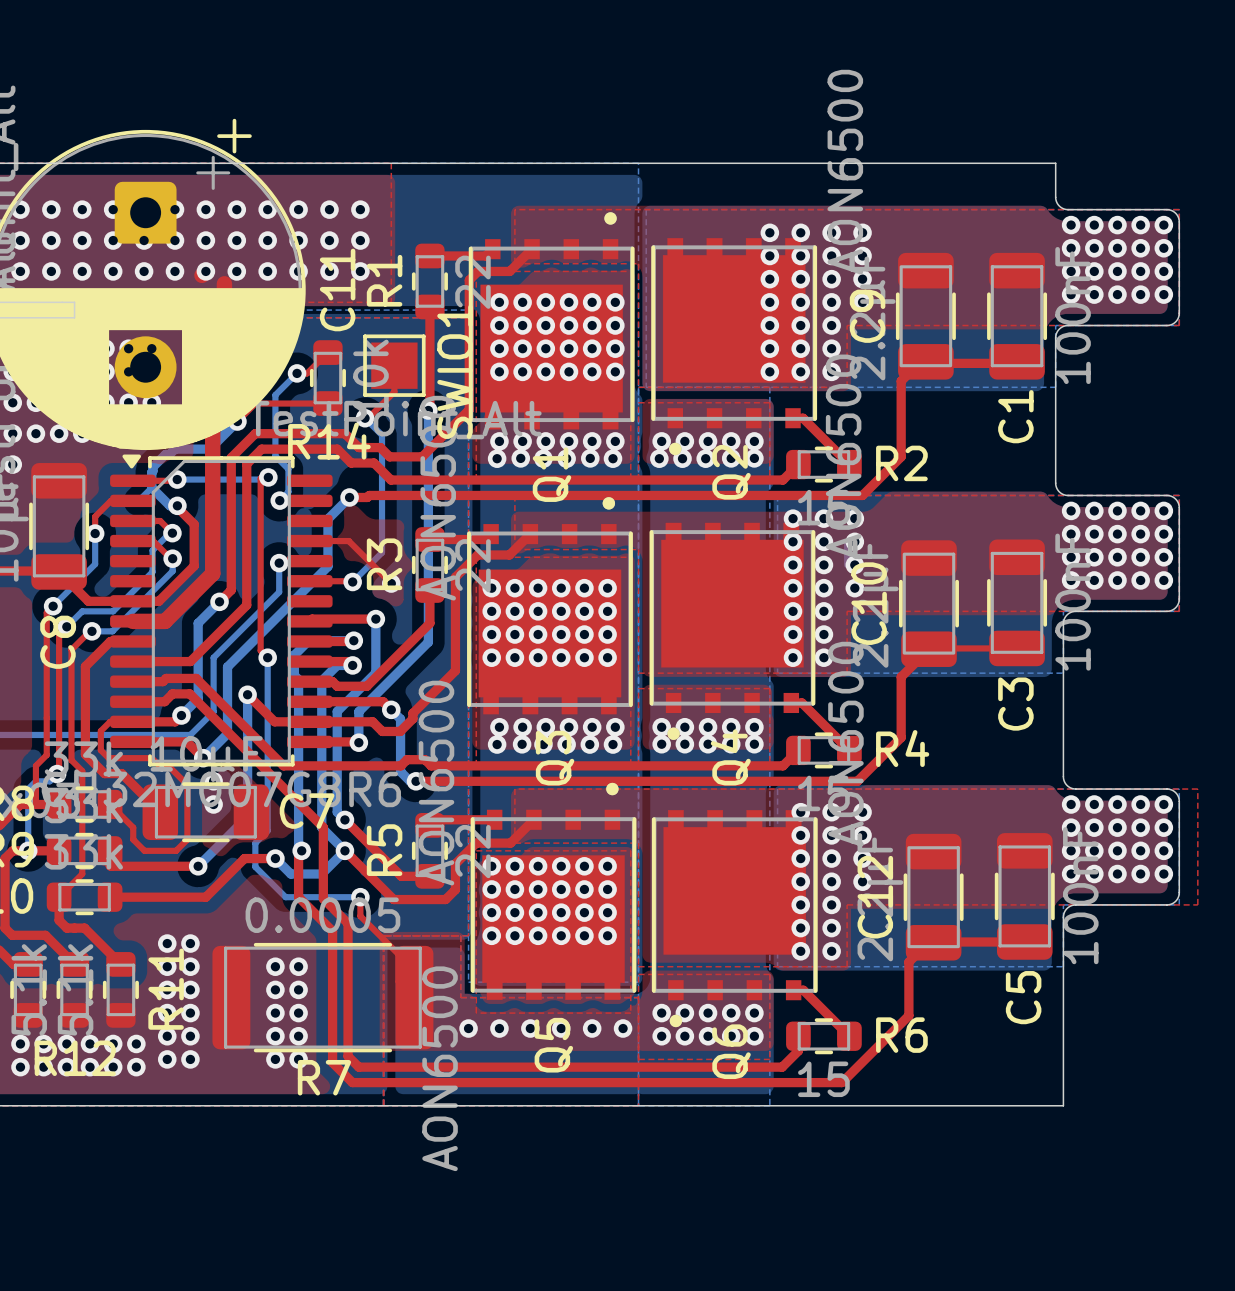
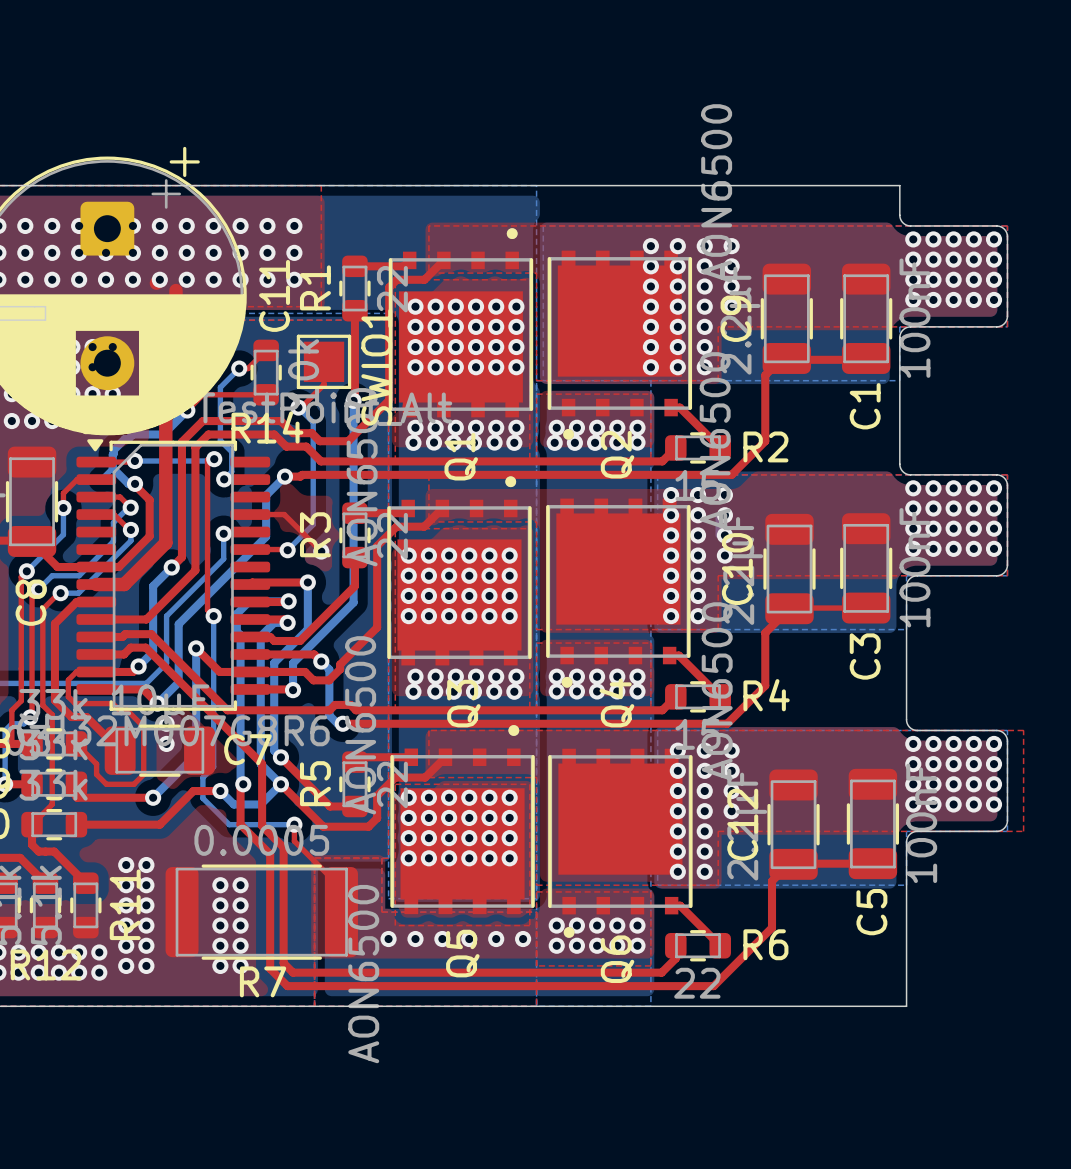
R6 value: 15 (823, 1079) -> 22 (697, 983)

